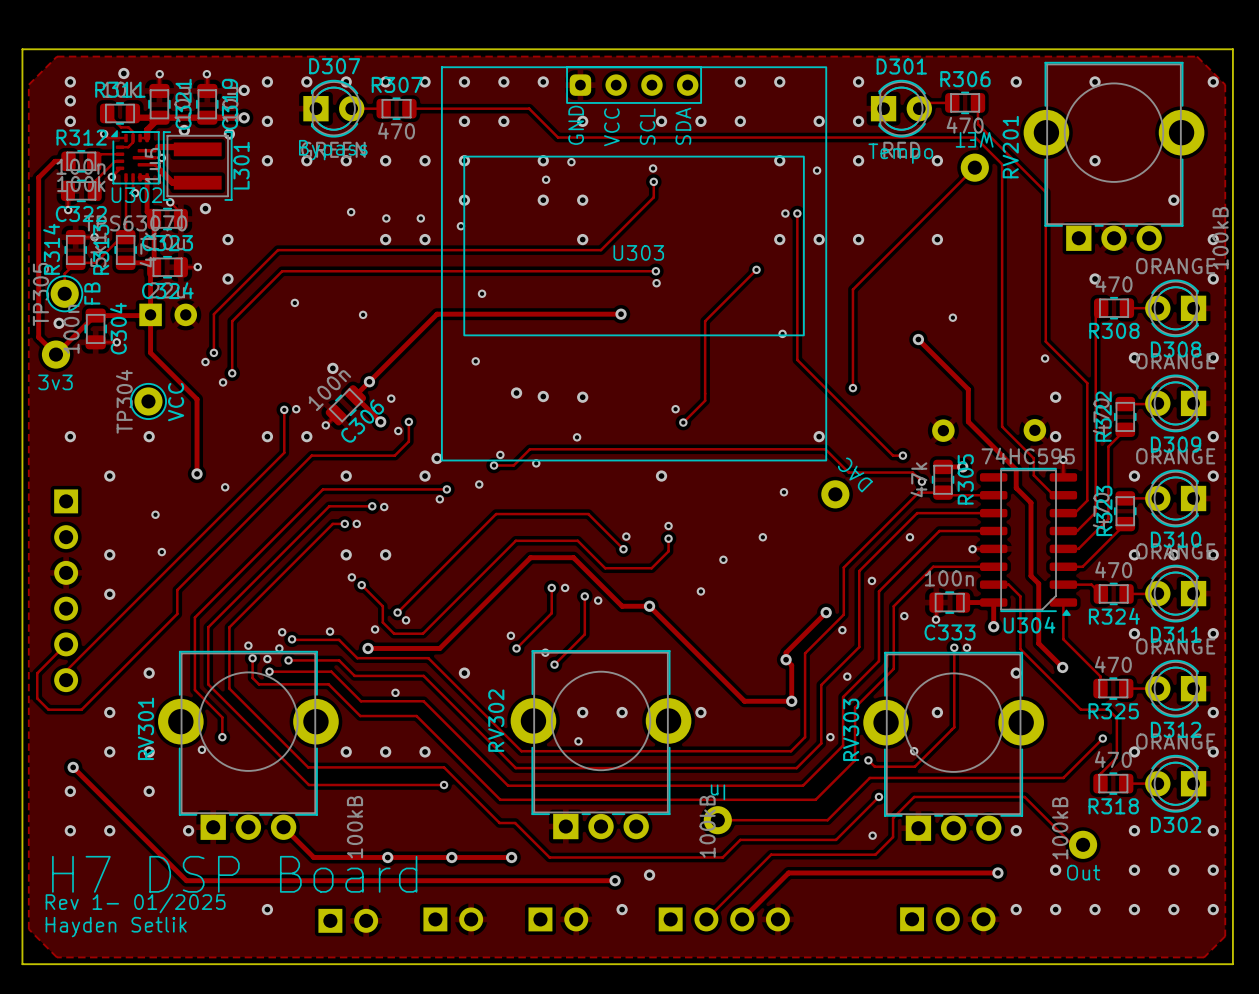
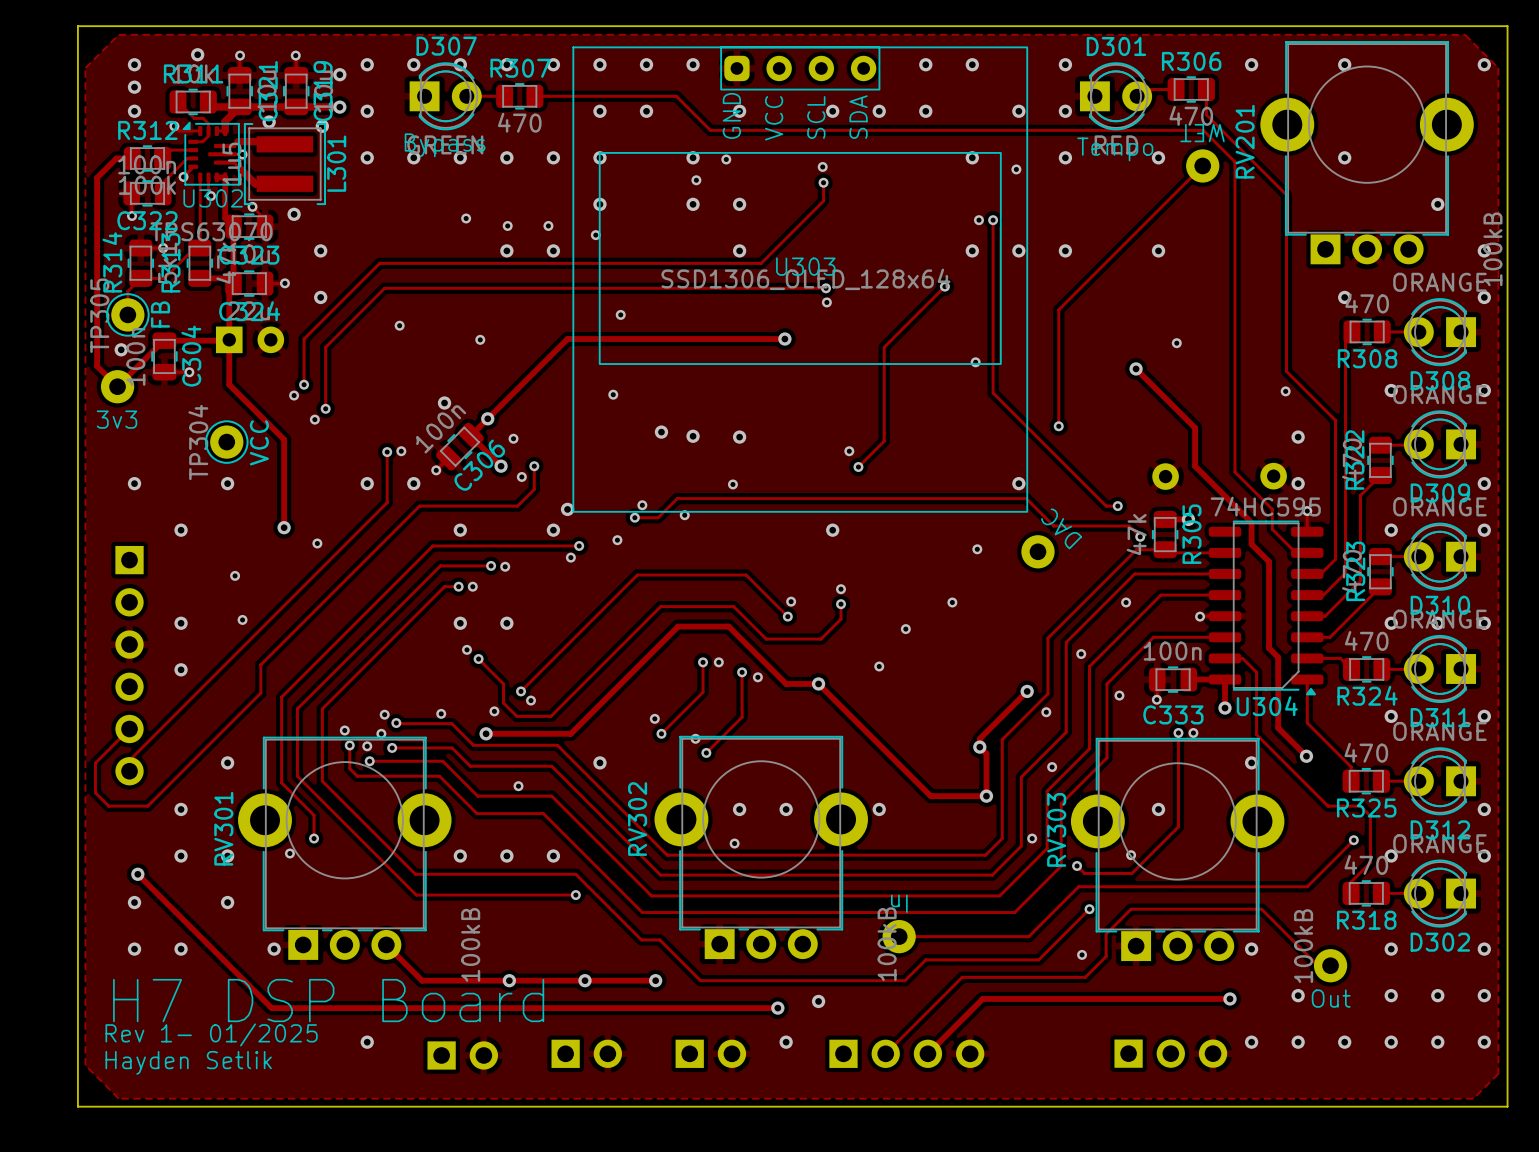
U303 value: none -> SSD1306_OLED_128x64 (805, 279)

